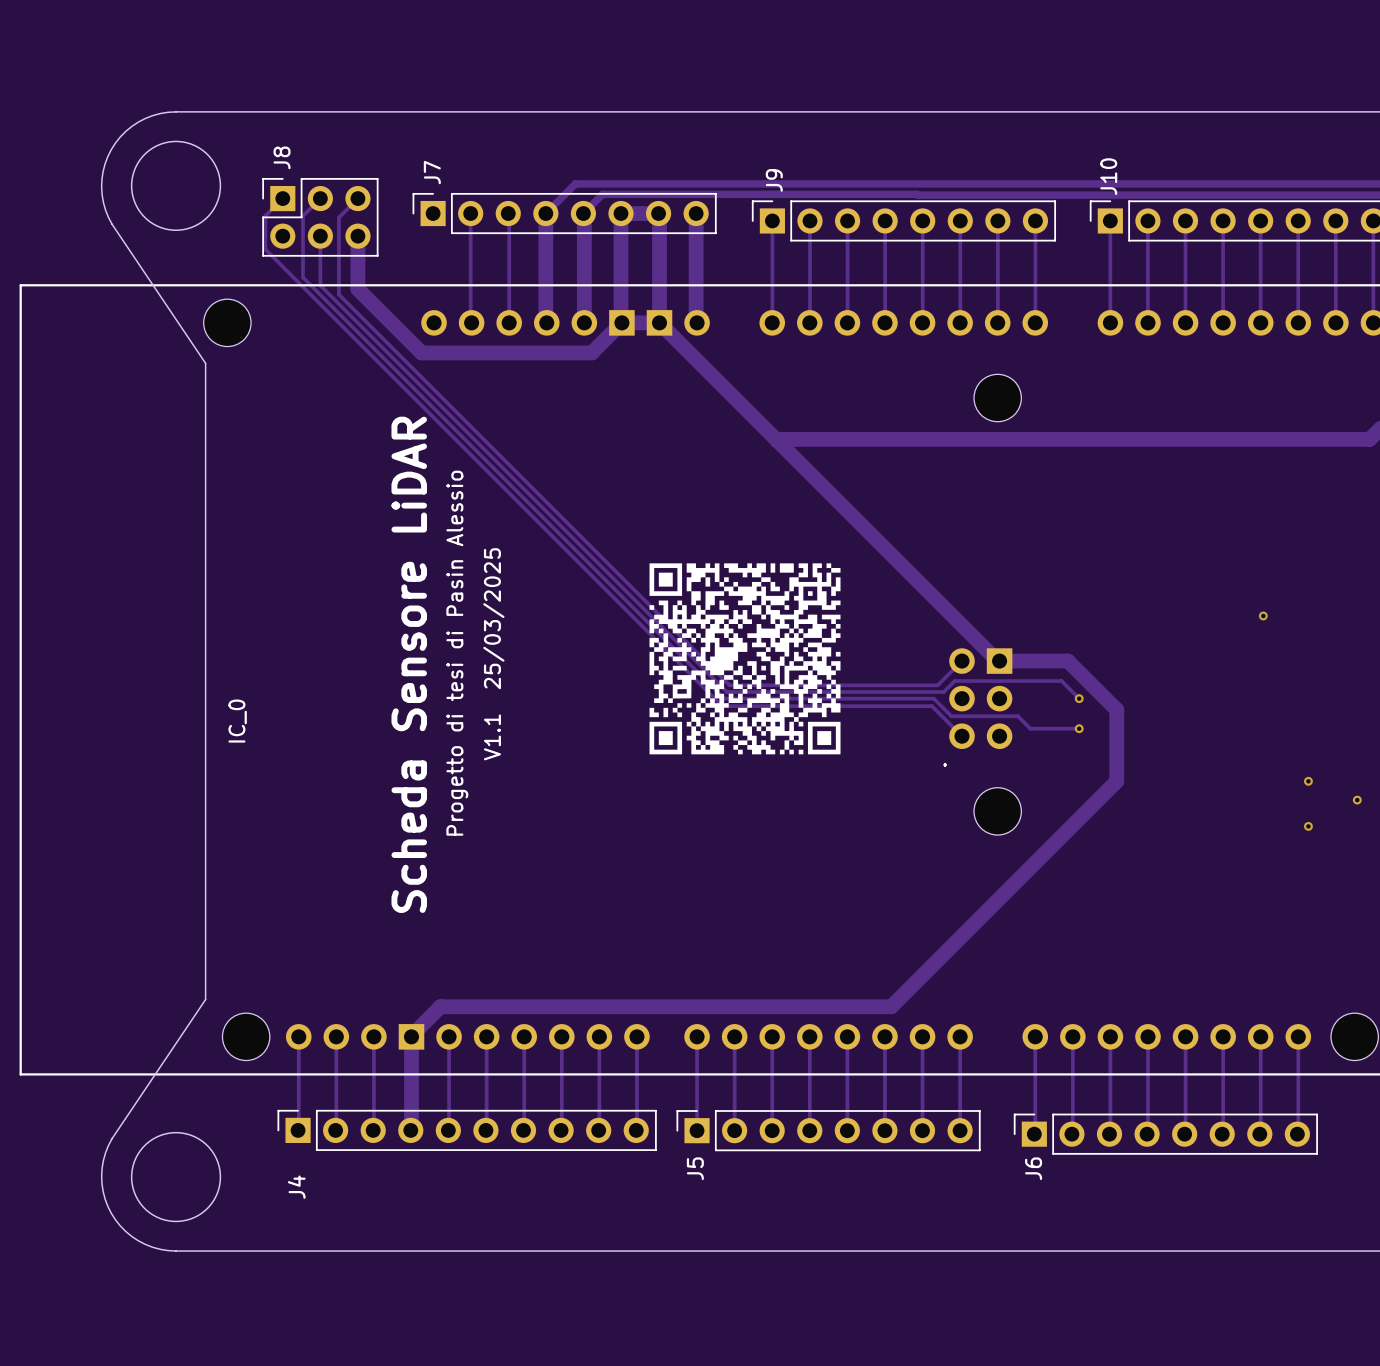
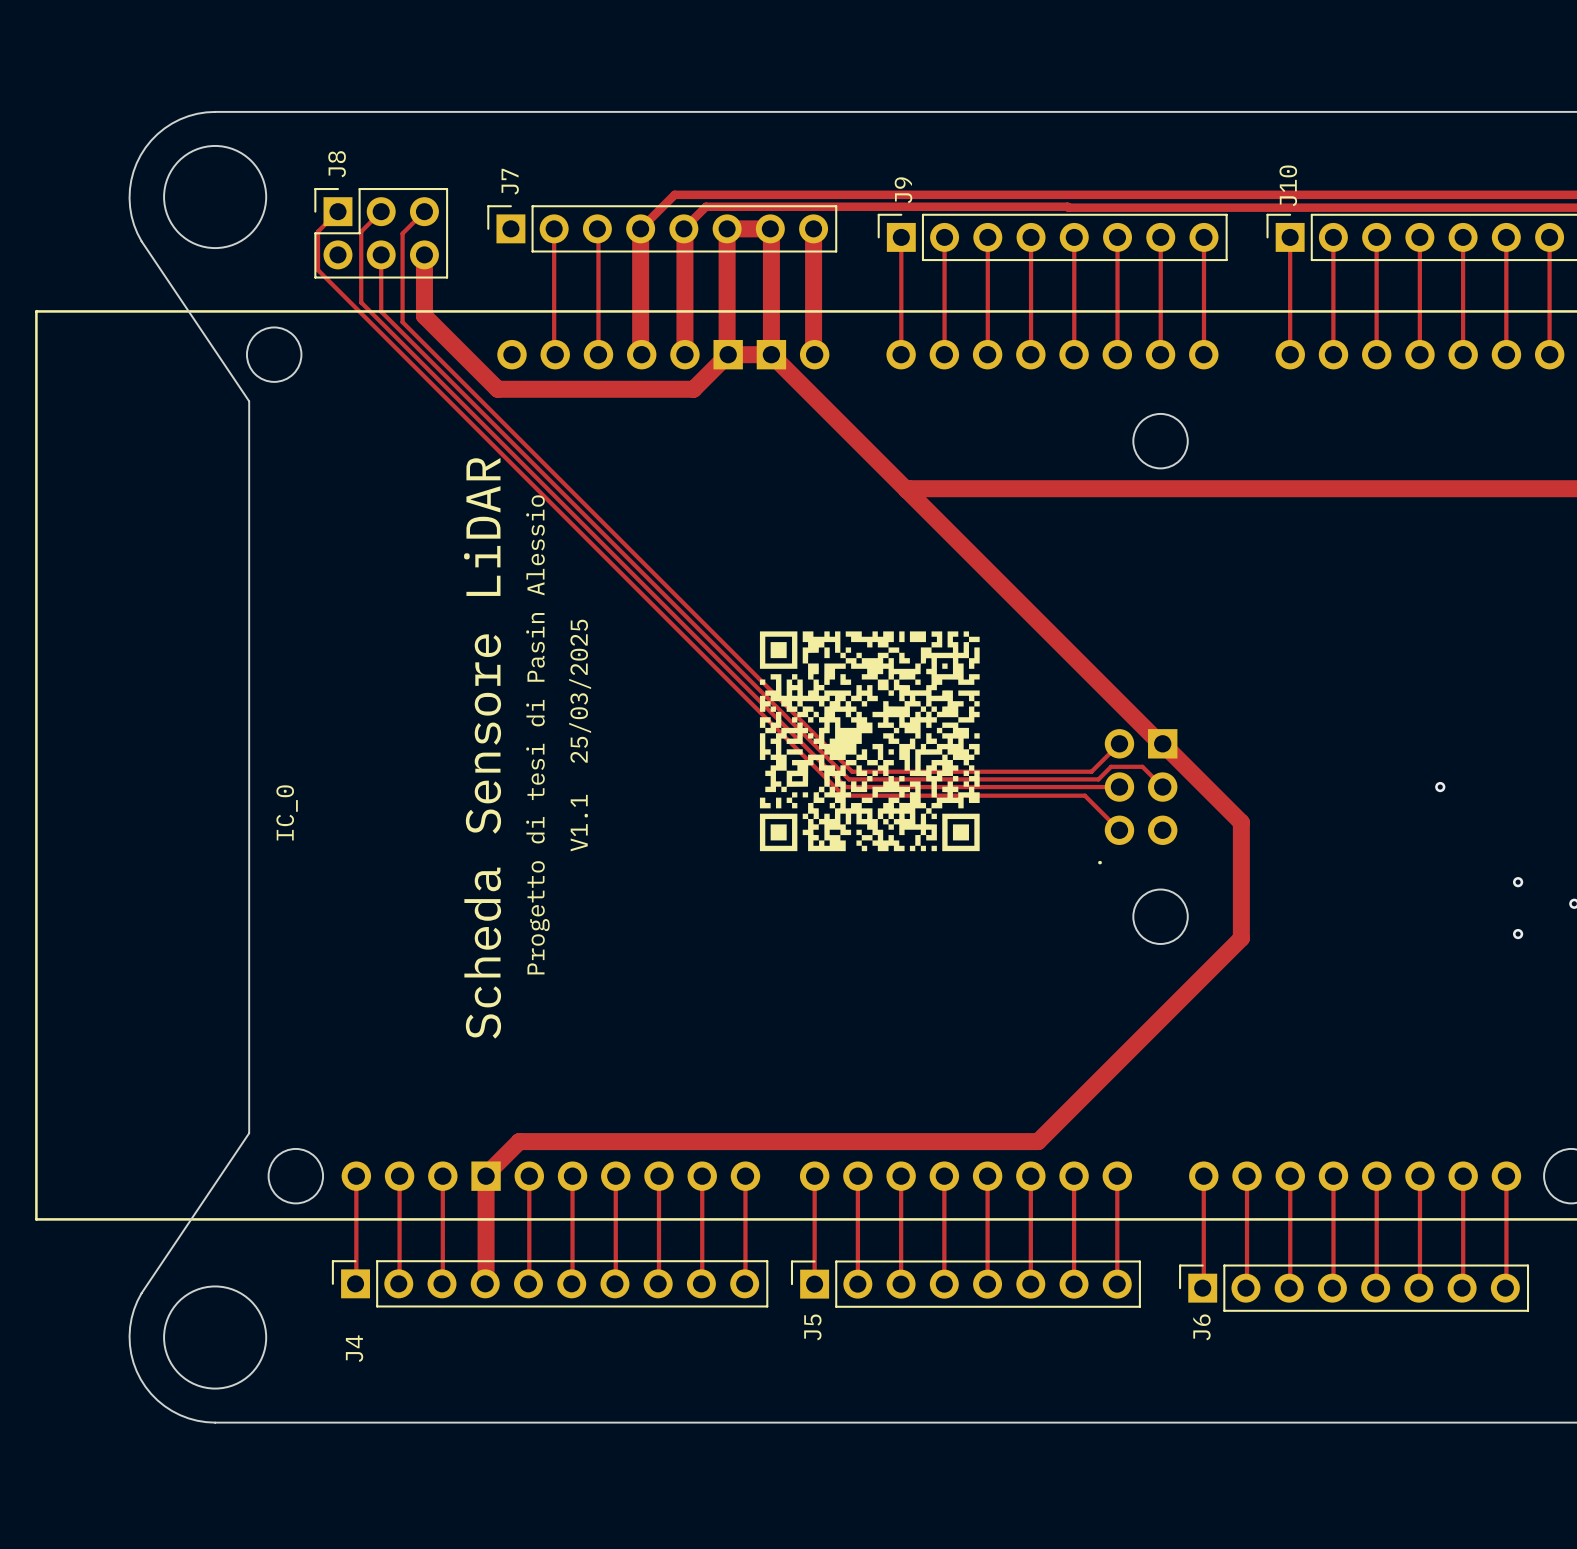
via: (1263, 615) -> none
track: (999, 661) (1067, 661) (1116, 709) (1116, 781) (1067, 830) -> (1162, 743) (1241, 822) (1241, 938)
track: (981, 681) (1061, 681) (1079, 698) -> (1142, 766) (1162, 787)
track: (933, 698) (951, 716) (1017, 716) (1030, 728) (1079, 728) -> (1087, 787) (1119, 787)
via: (1079, 698) -> none
via: none -> (1440, 787)
via: (1079, 728) -> none

